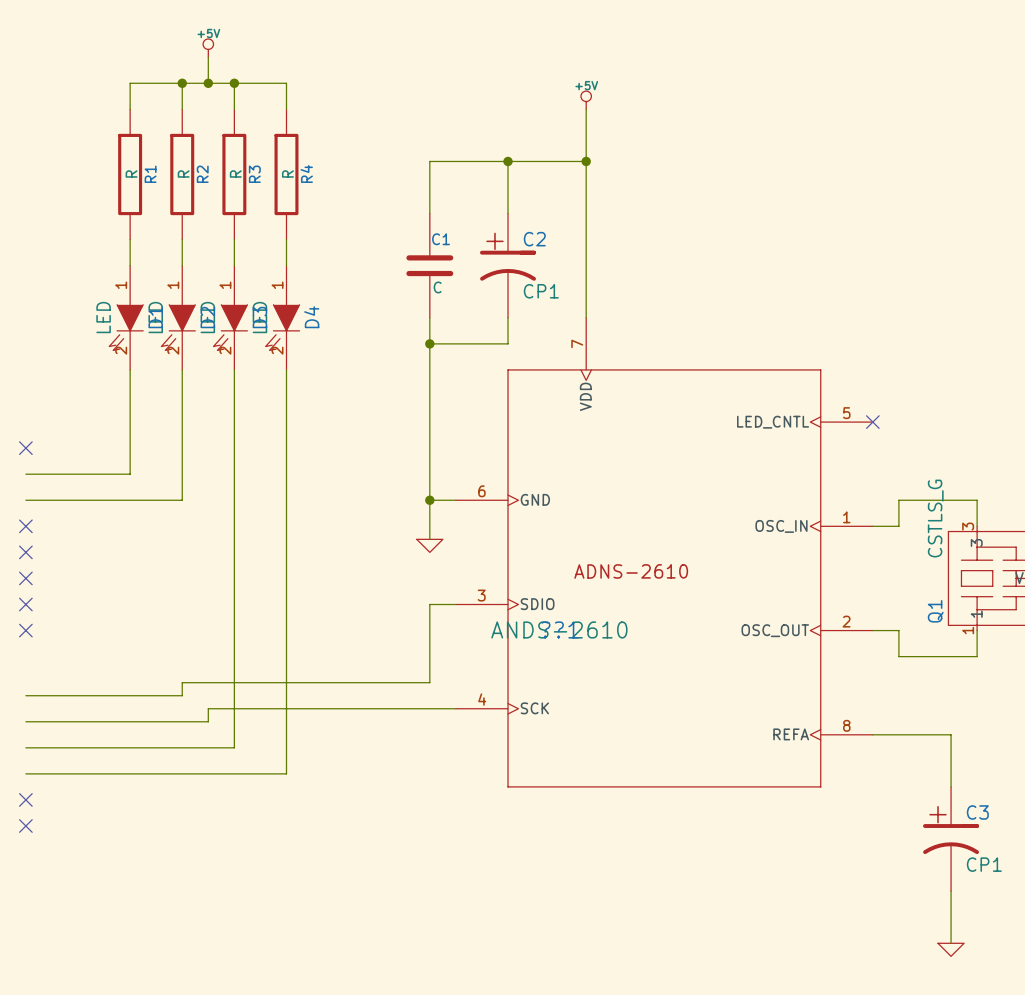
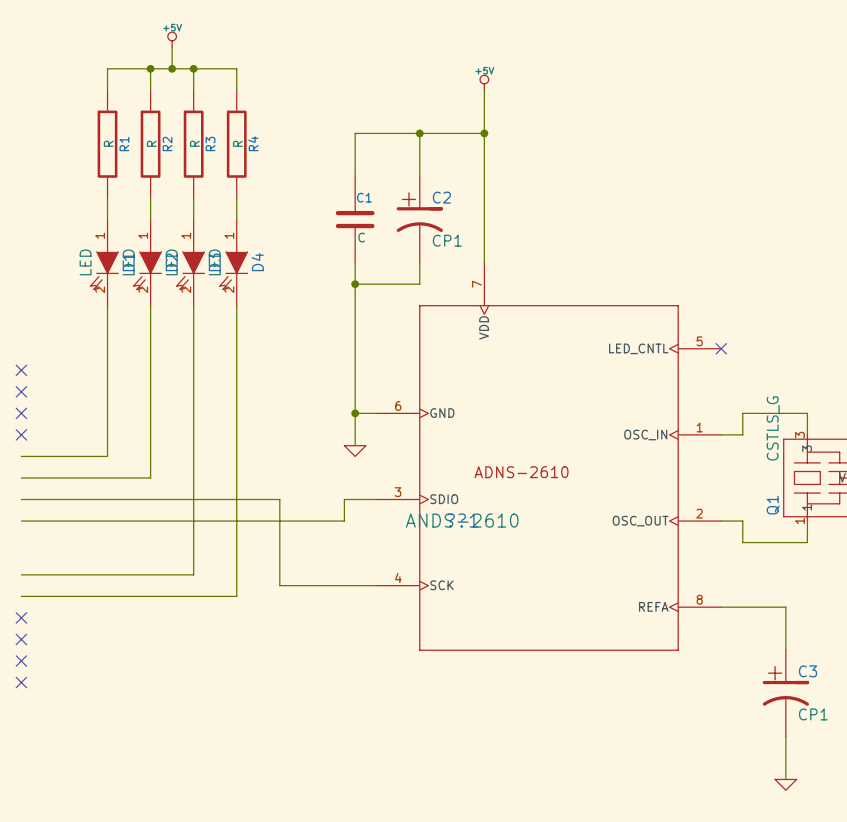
wire: (25, 474) (130, 474) -> (21, 456) (107, 456) (107, 391)
no-connect mark: none -> (21, 391)
wire: (25, 500) (182, 500) -> (21, 477) (150, 477) (150, 413)
no-connect mark: none -> (21, 413)
no-connect mark: (25, 552) -> none
no-connect mark: (25, 578) -> none
wire: none -> (21, 499) (279, 499) (279, 585)
no-connect mark: (25, 604) -> none
wire: (429, 604) (429, 682) (182, 682) (182, 695) -> (355, 499) (344, 499) (344, 521) (21, 521)
no-connect mark: (25, 630) -> none
wire: (234, 695) (234, 747) (25, 747) -> (193, 574) (150, 574)
wire: (338, 708) (208, 708) (208, 721) -> (236, 596) (172, 596)
wire: (286, 721) (286, 773) (25, 773) -> none
no-connect mark: none -> (21, 617)
no-connect mark: none -> (21, 639)

